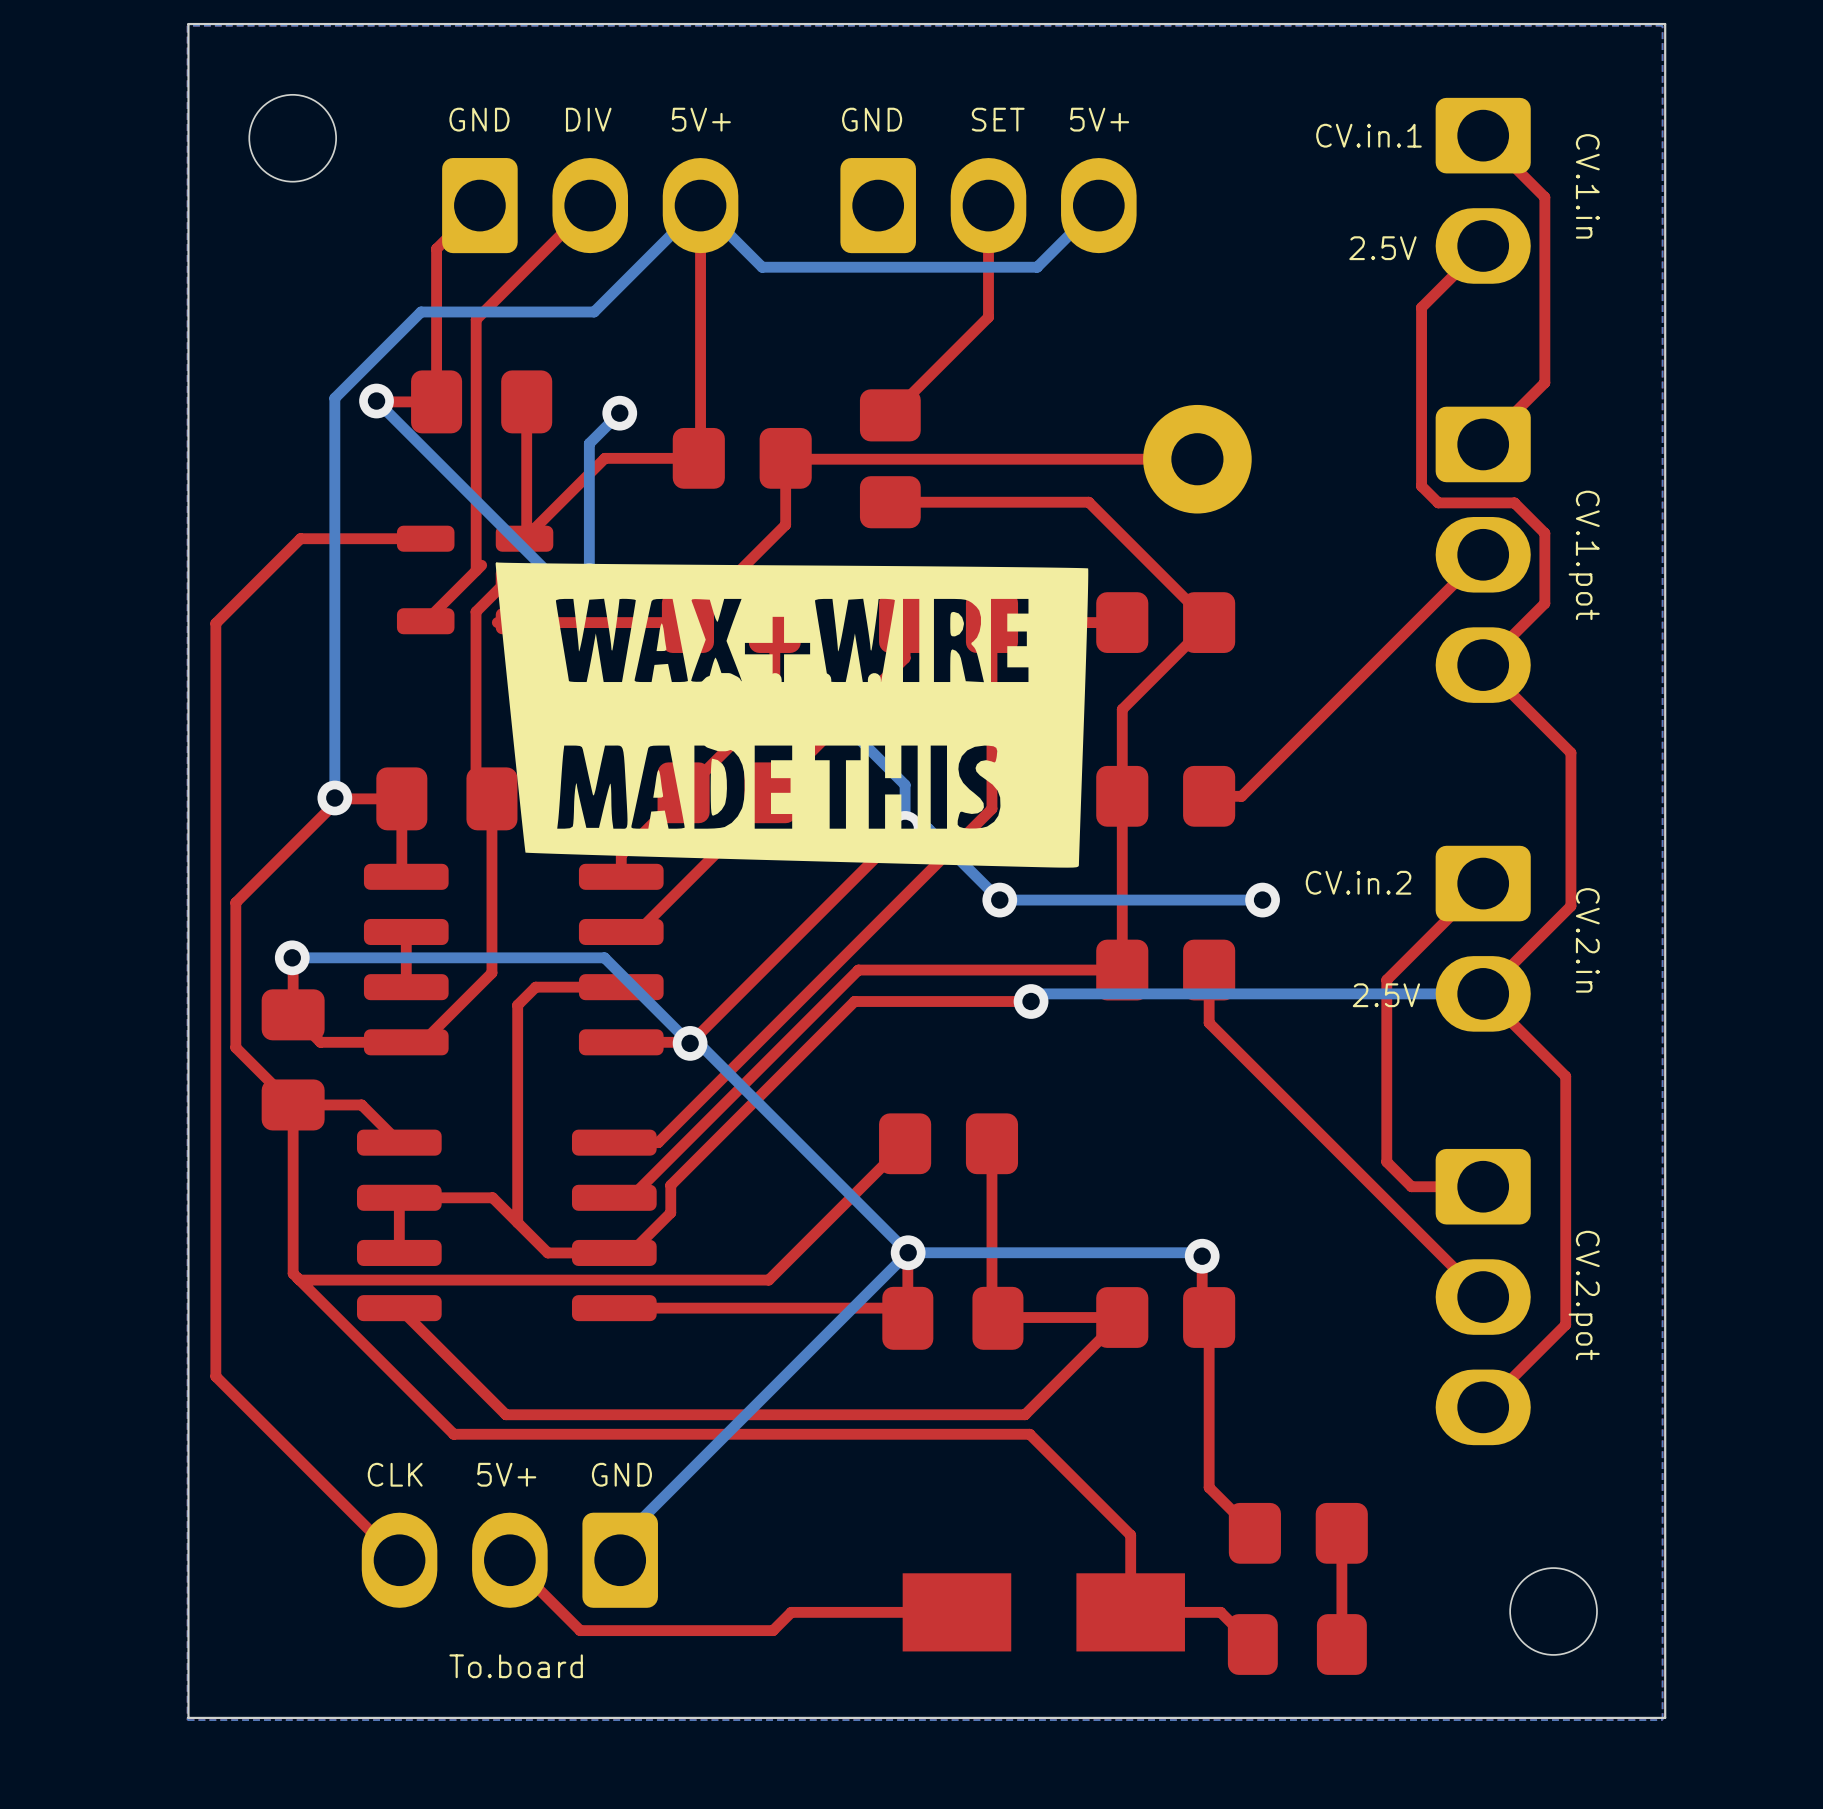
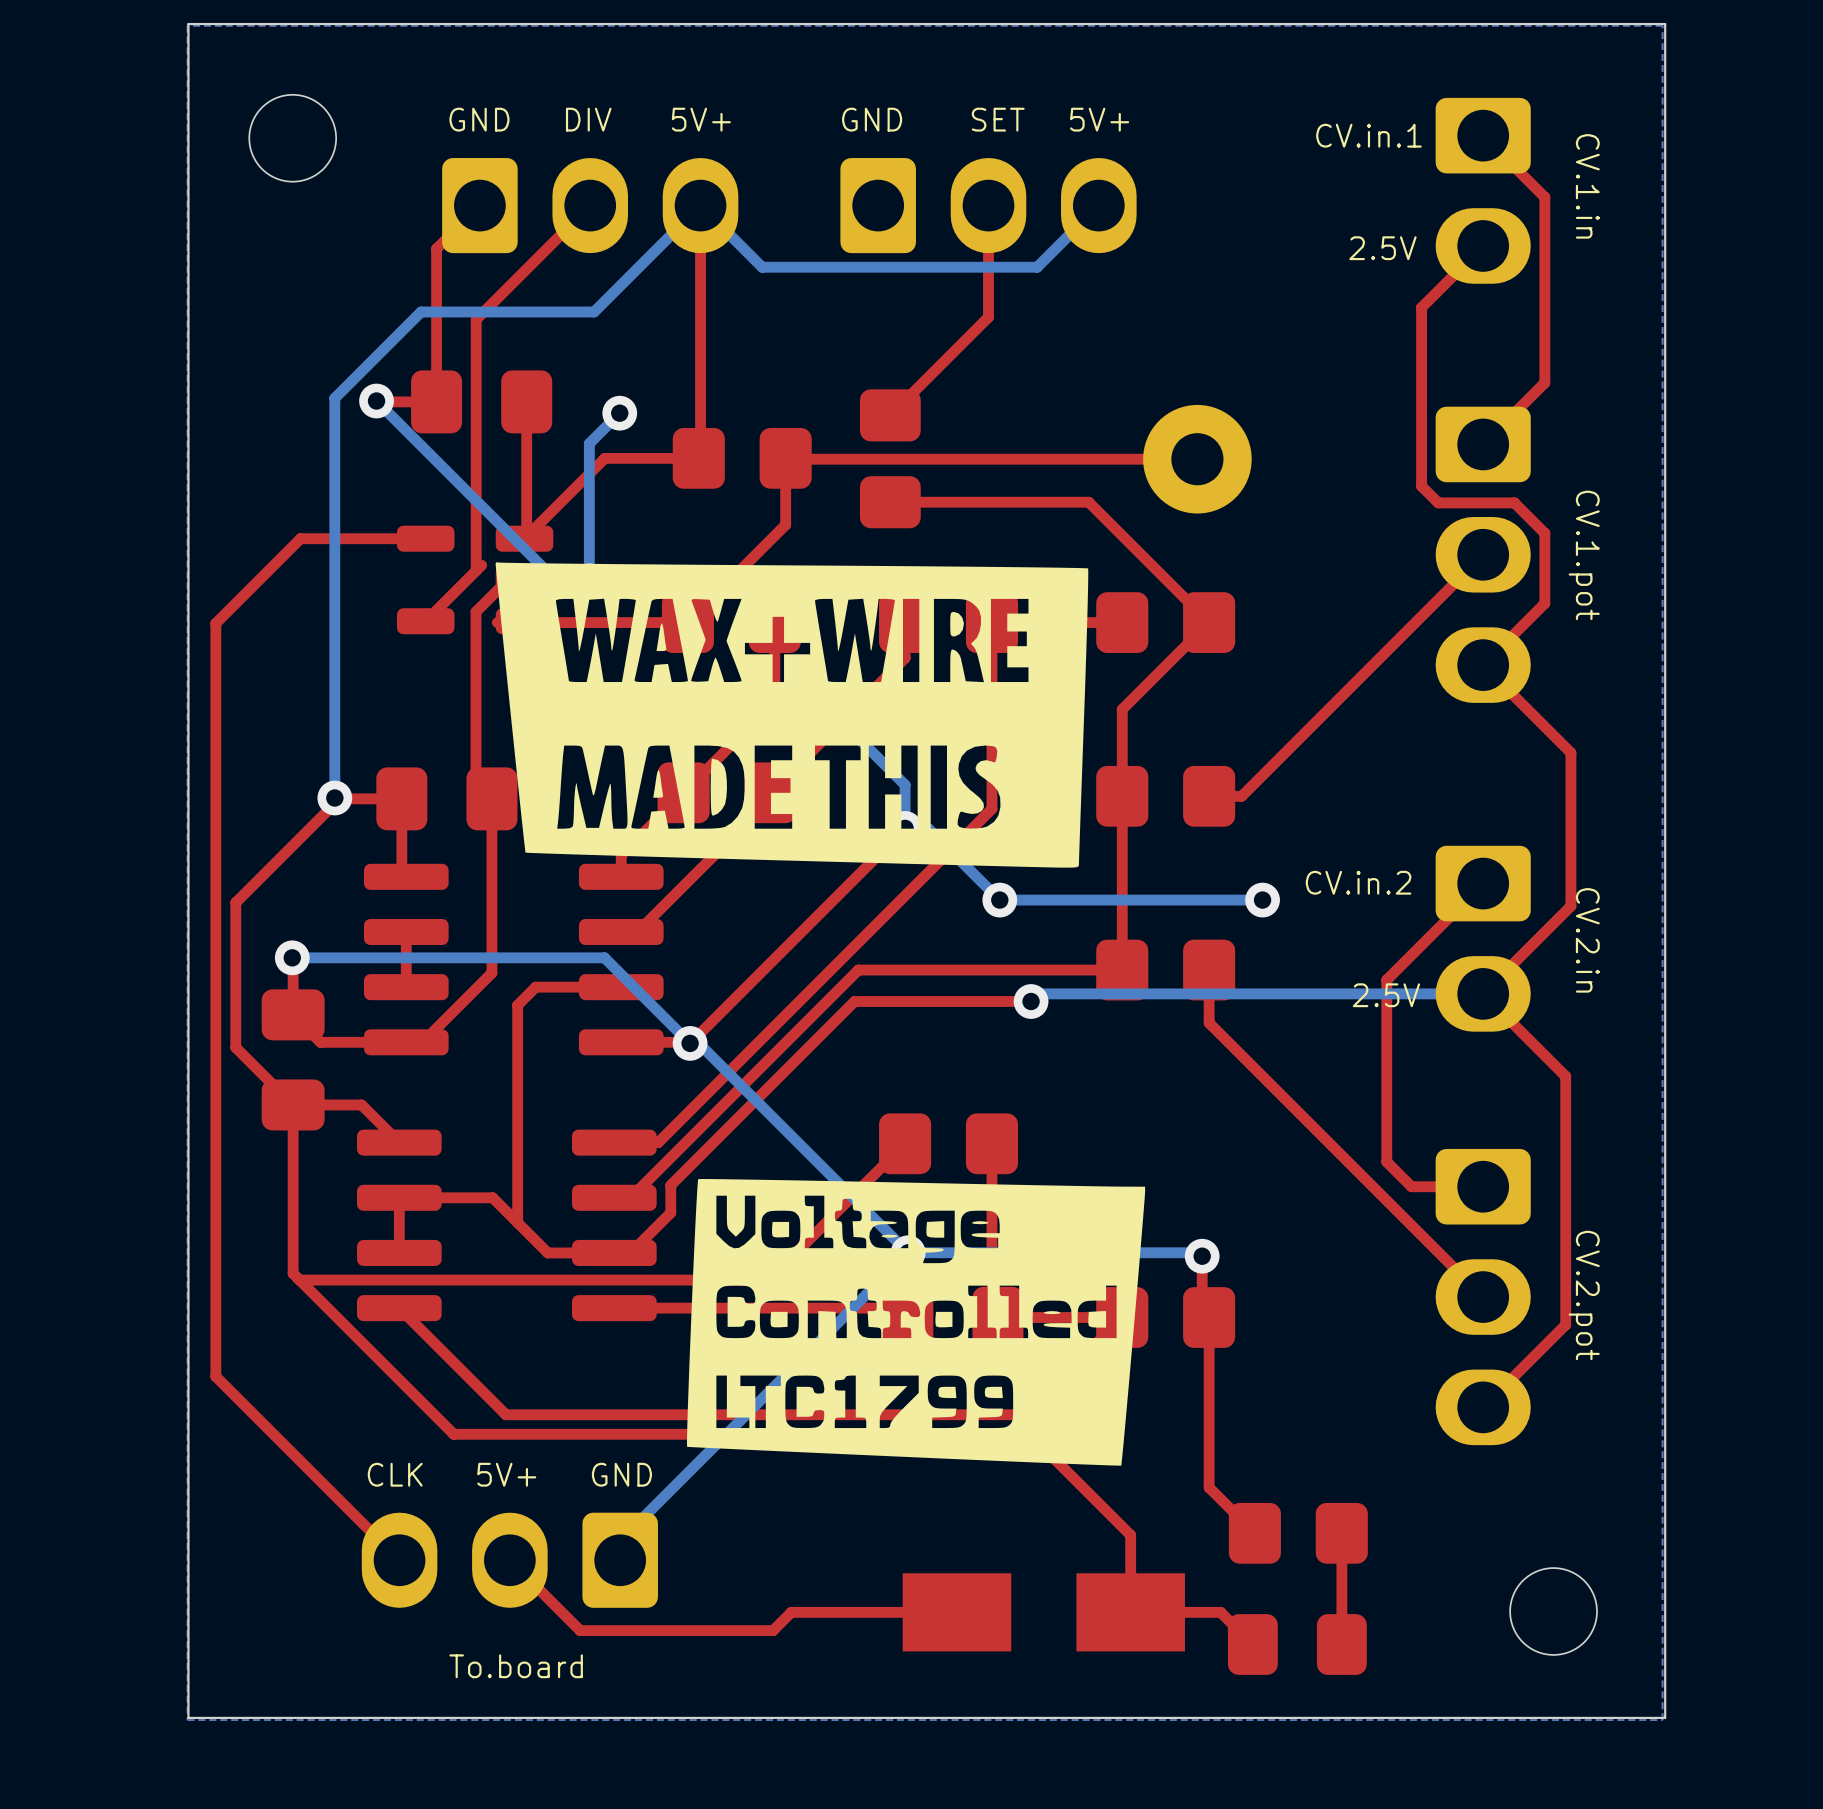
drawing: none -> [495, 562, 1089, 868]
part: (791, 714) -> none
drawing: none -> [687, 1179, 1146, 1466]

